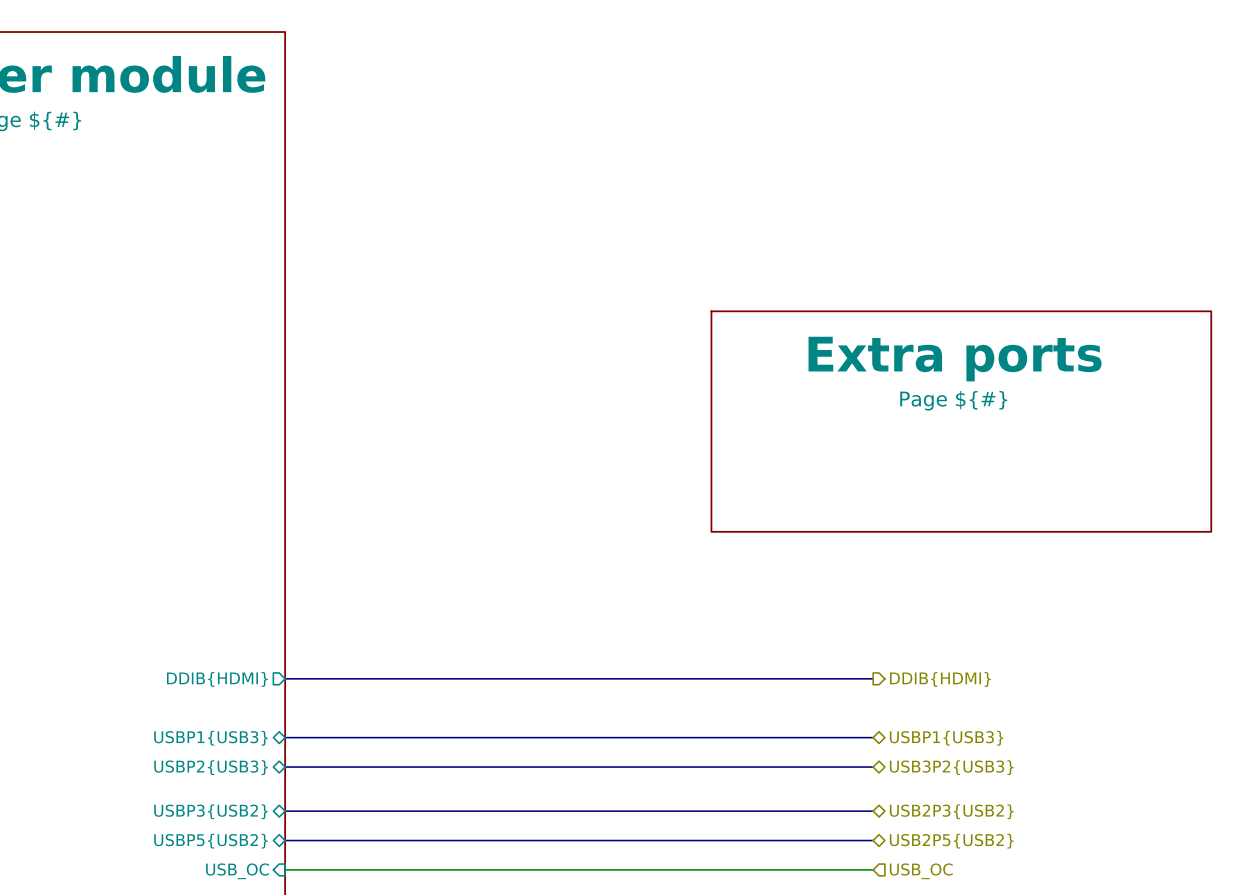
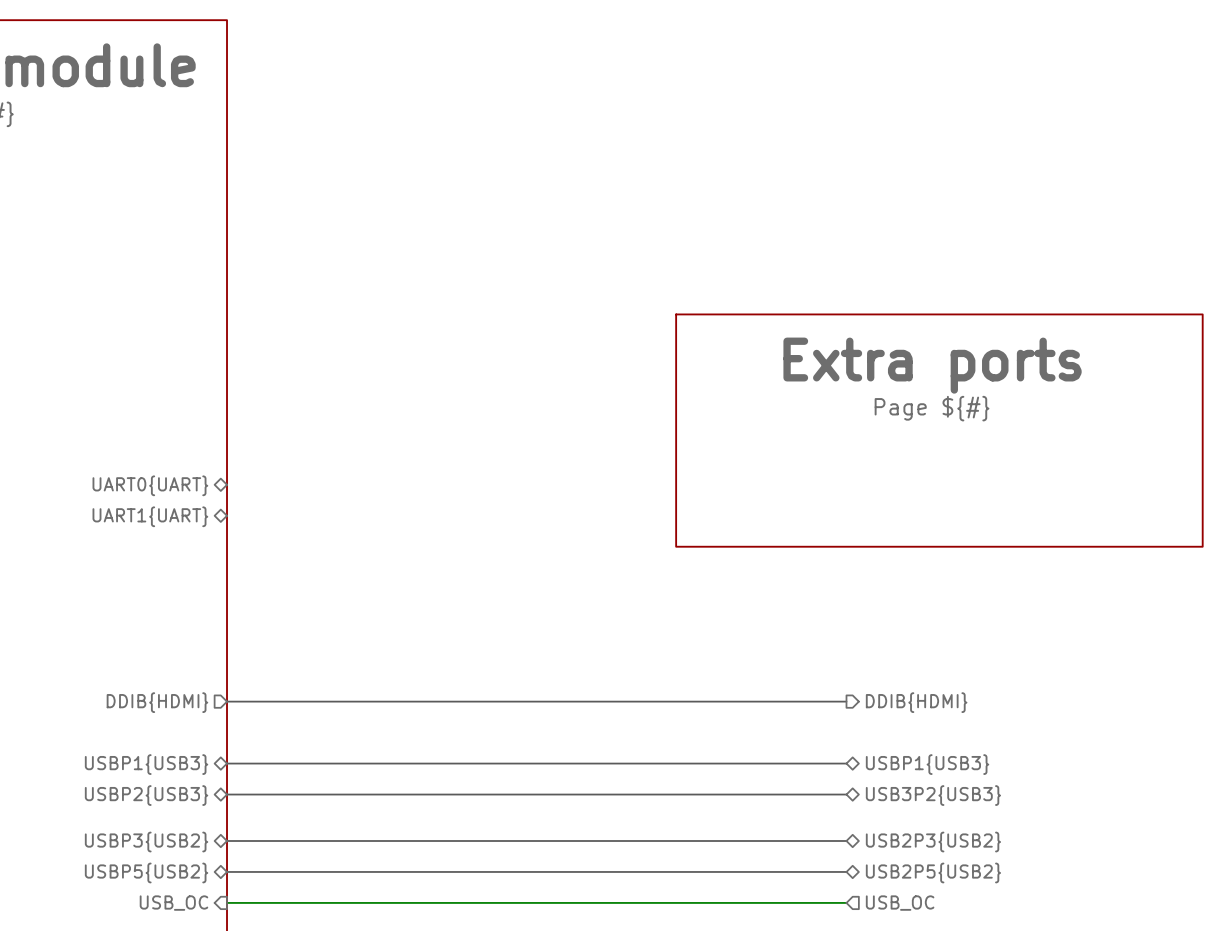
sheet pin: none -> UART0{UART} (150, 485)
sheet pin: none -> UART1{UART} (150, 516)

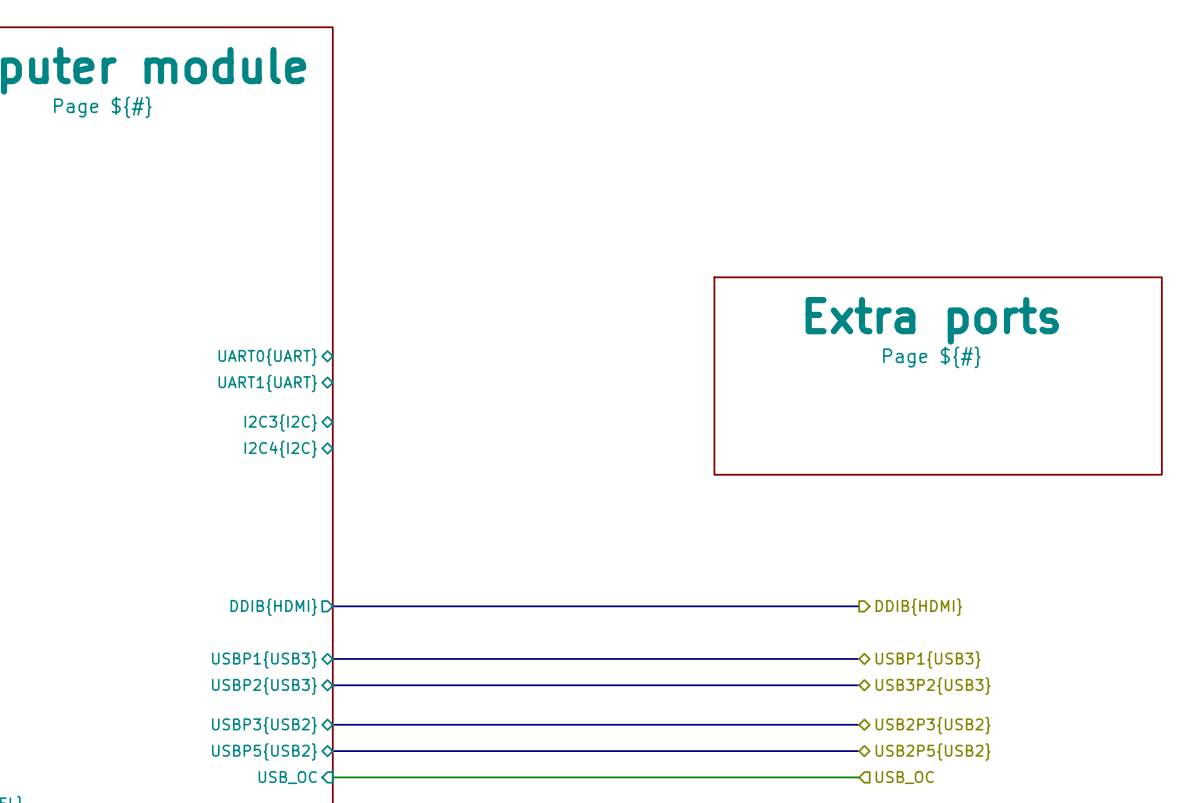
sheet pin: none -> UART0{UART} (267, 357)
sheet pin: none -> UART1{UART} (267, 383)
sheet pin: UART0{UART} (150, 485) -> I2C3{I2C} (280, 422)
sheet pin: UART1{UART} (150, 516) -> I2C4{I2C} (280, 449)

